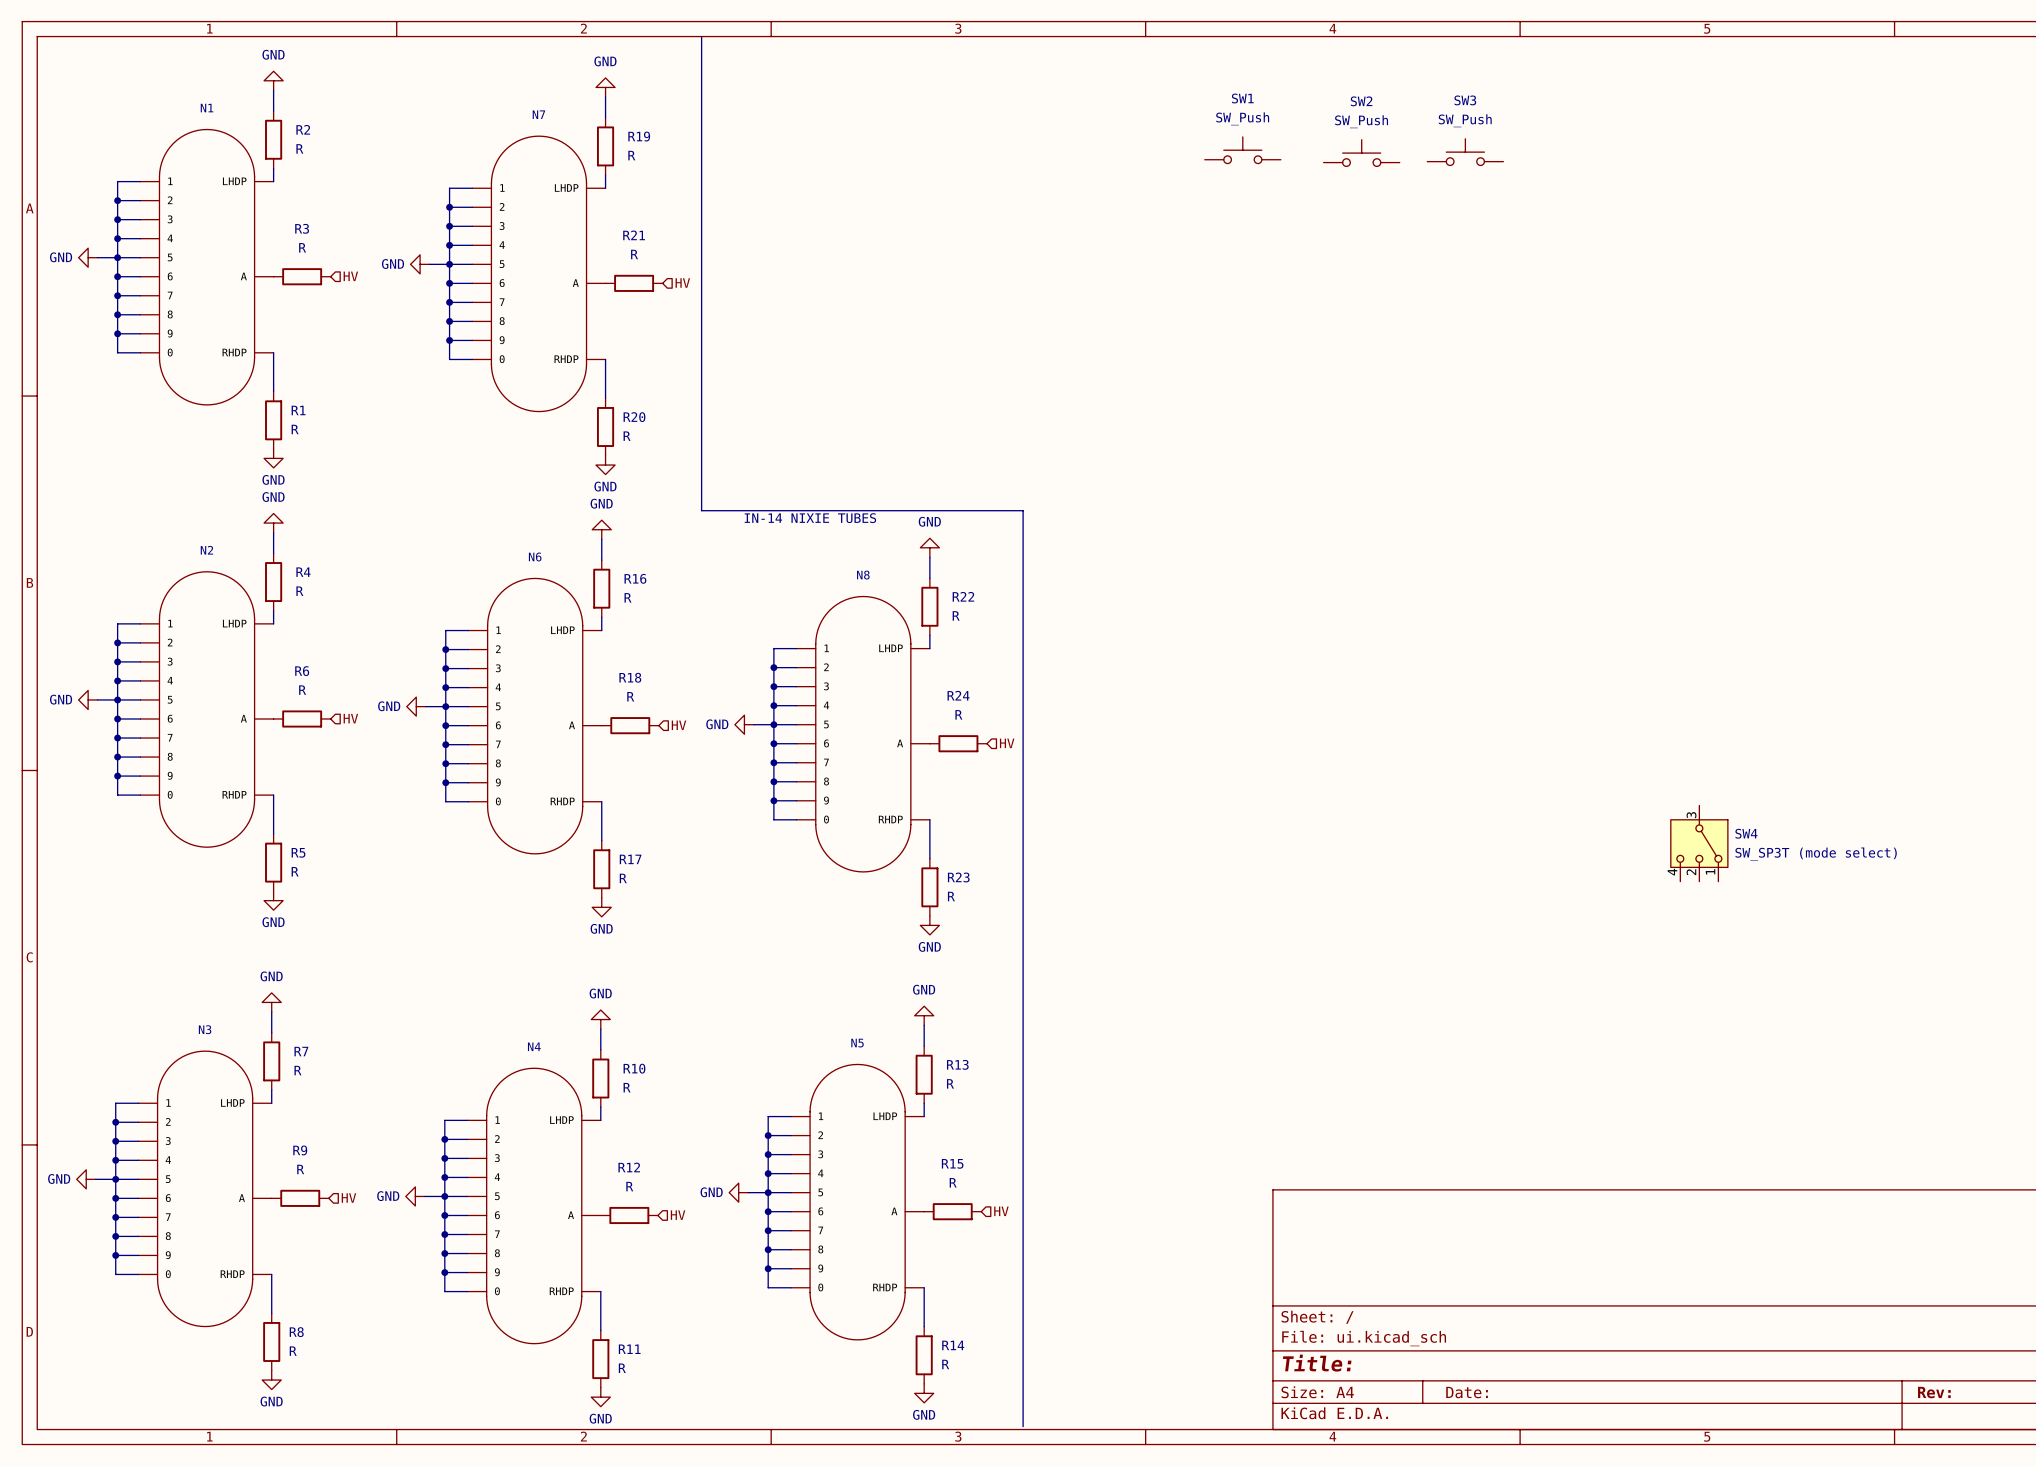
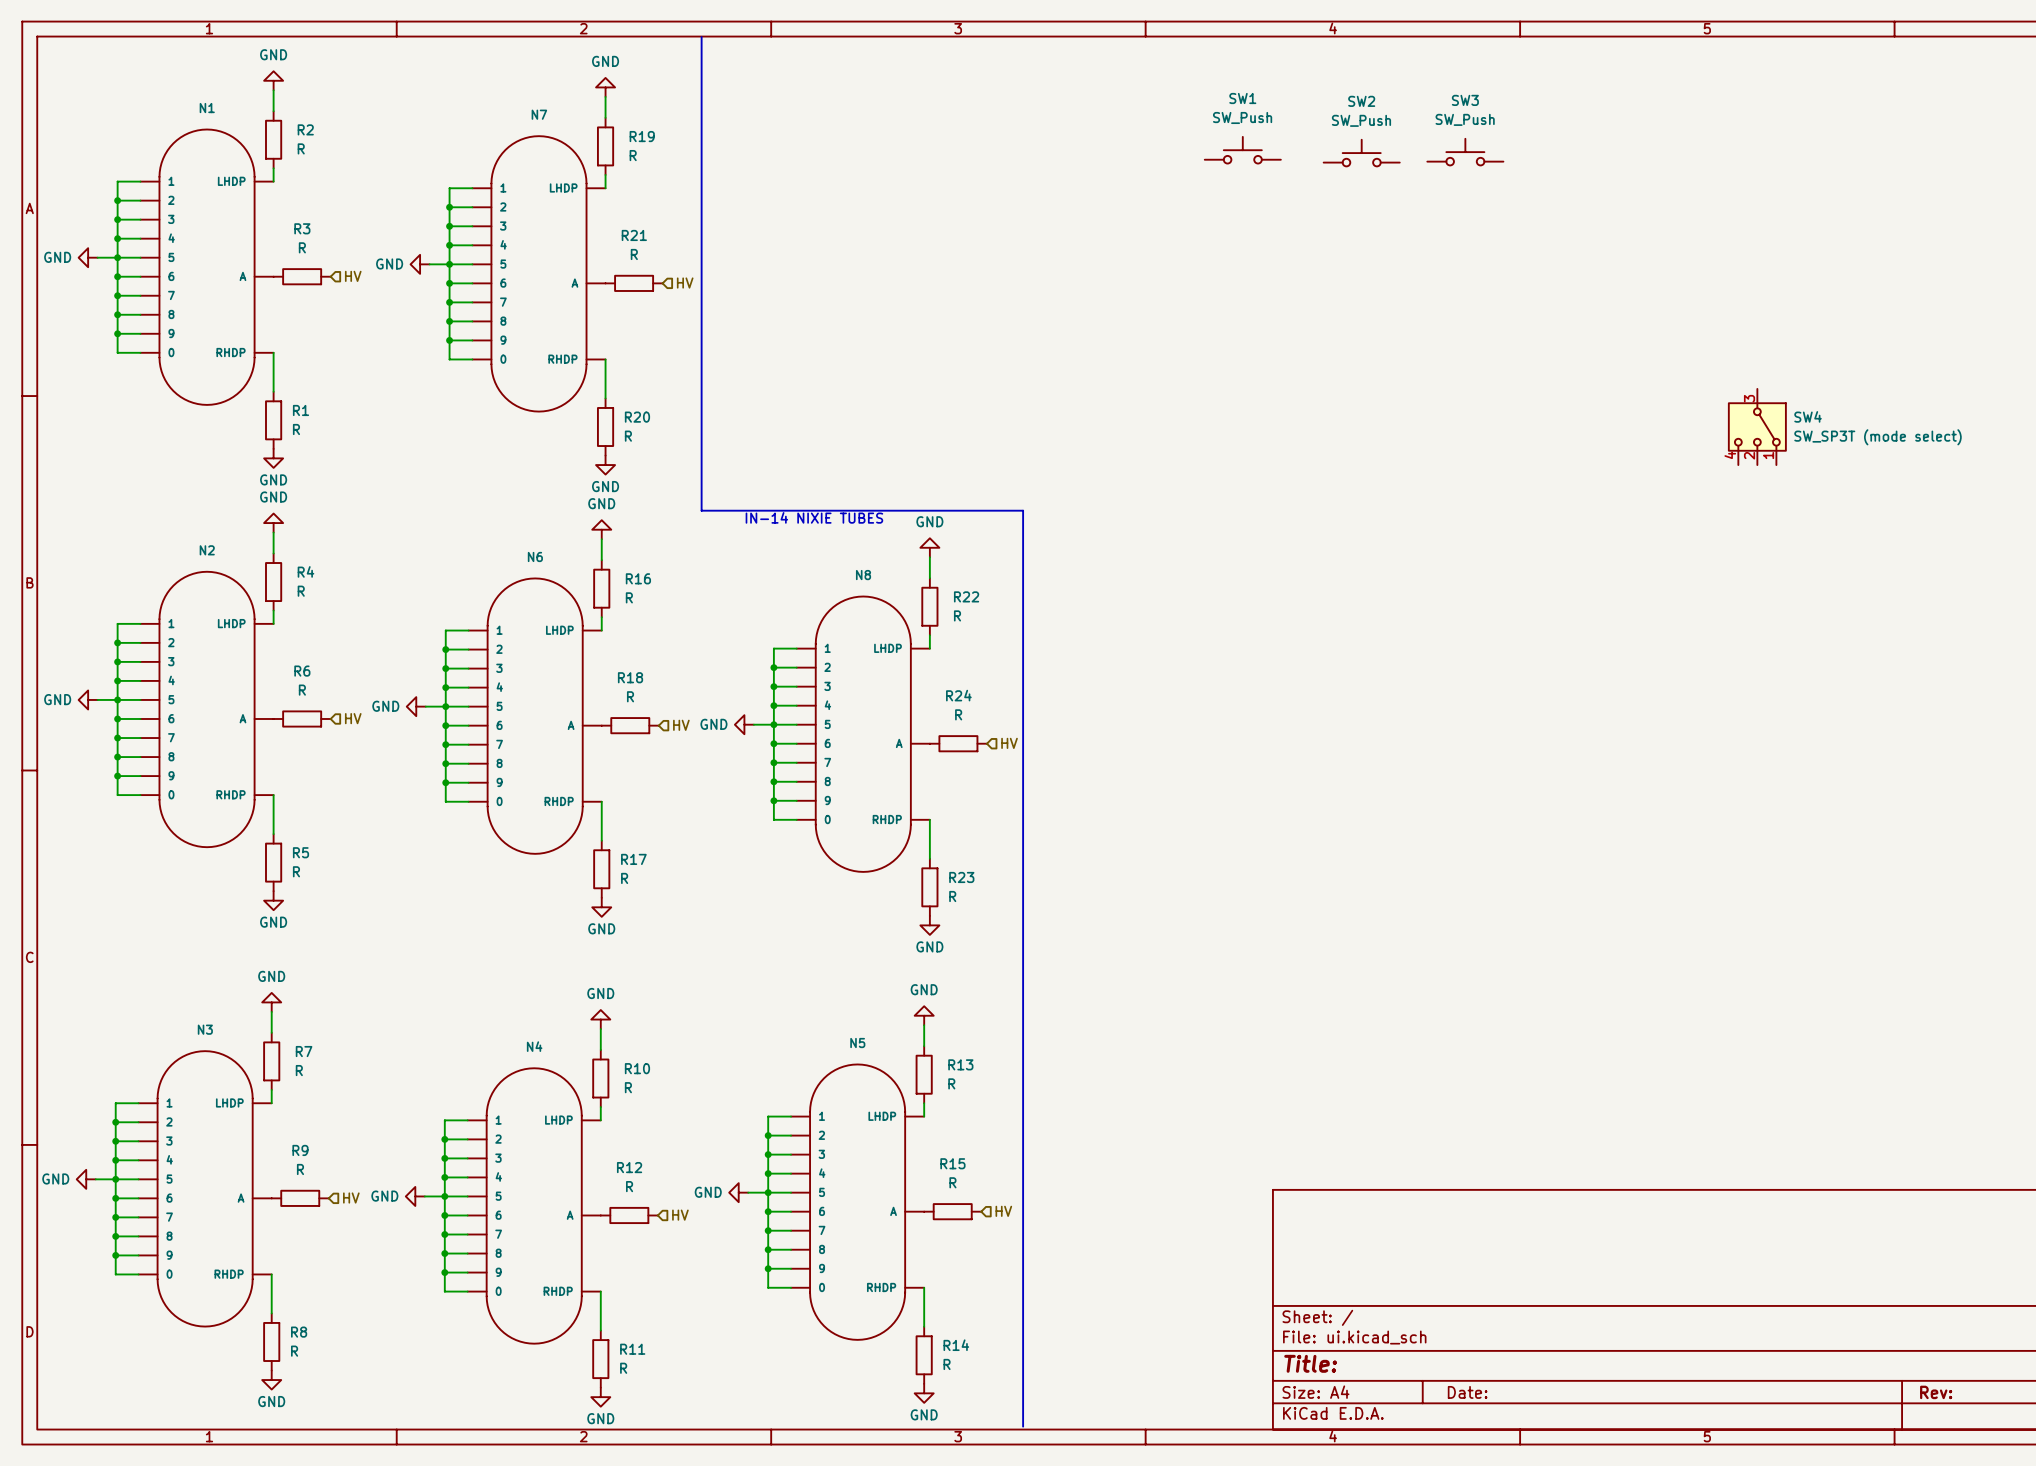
SW4 position: (1699, 843) -> (1757, 426)

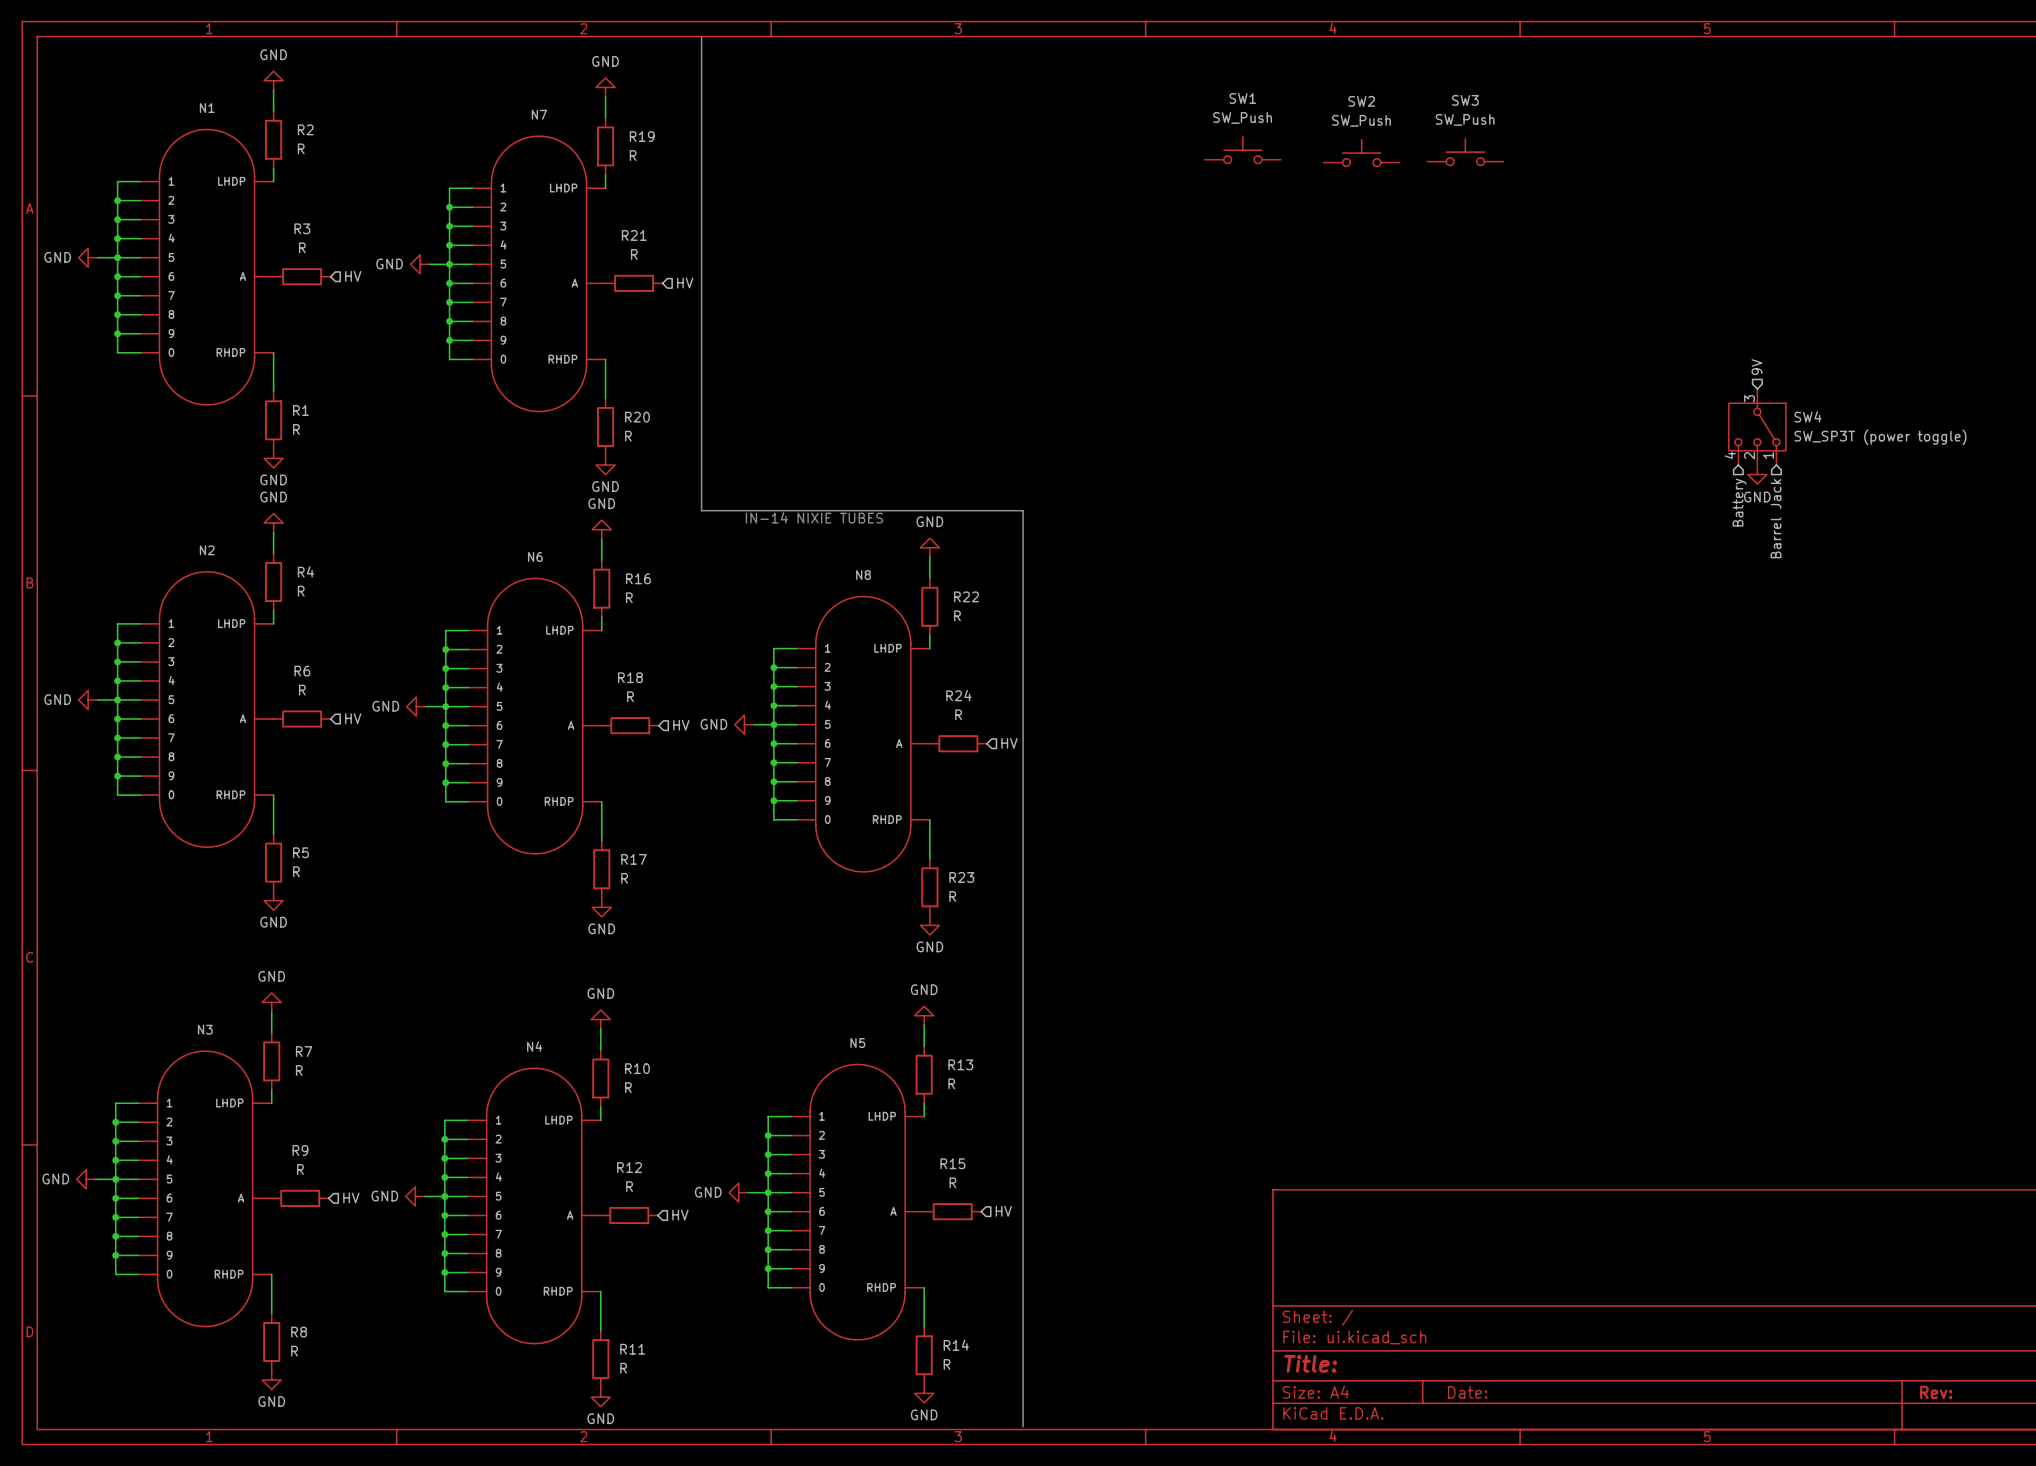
hierarchical label: none -> 9V (1757, 367)
SW4 value: SW_SP3T (mode select) (1878, 437) -> SW_SP3T (power toggle) (1880, 437)
power symbol: none -> GND (1757, 474)
hierarchical label: none -> Battery (1739, 502)
hierarchical label: none -> Barrel Jack (1776, 518)

